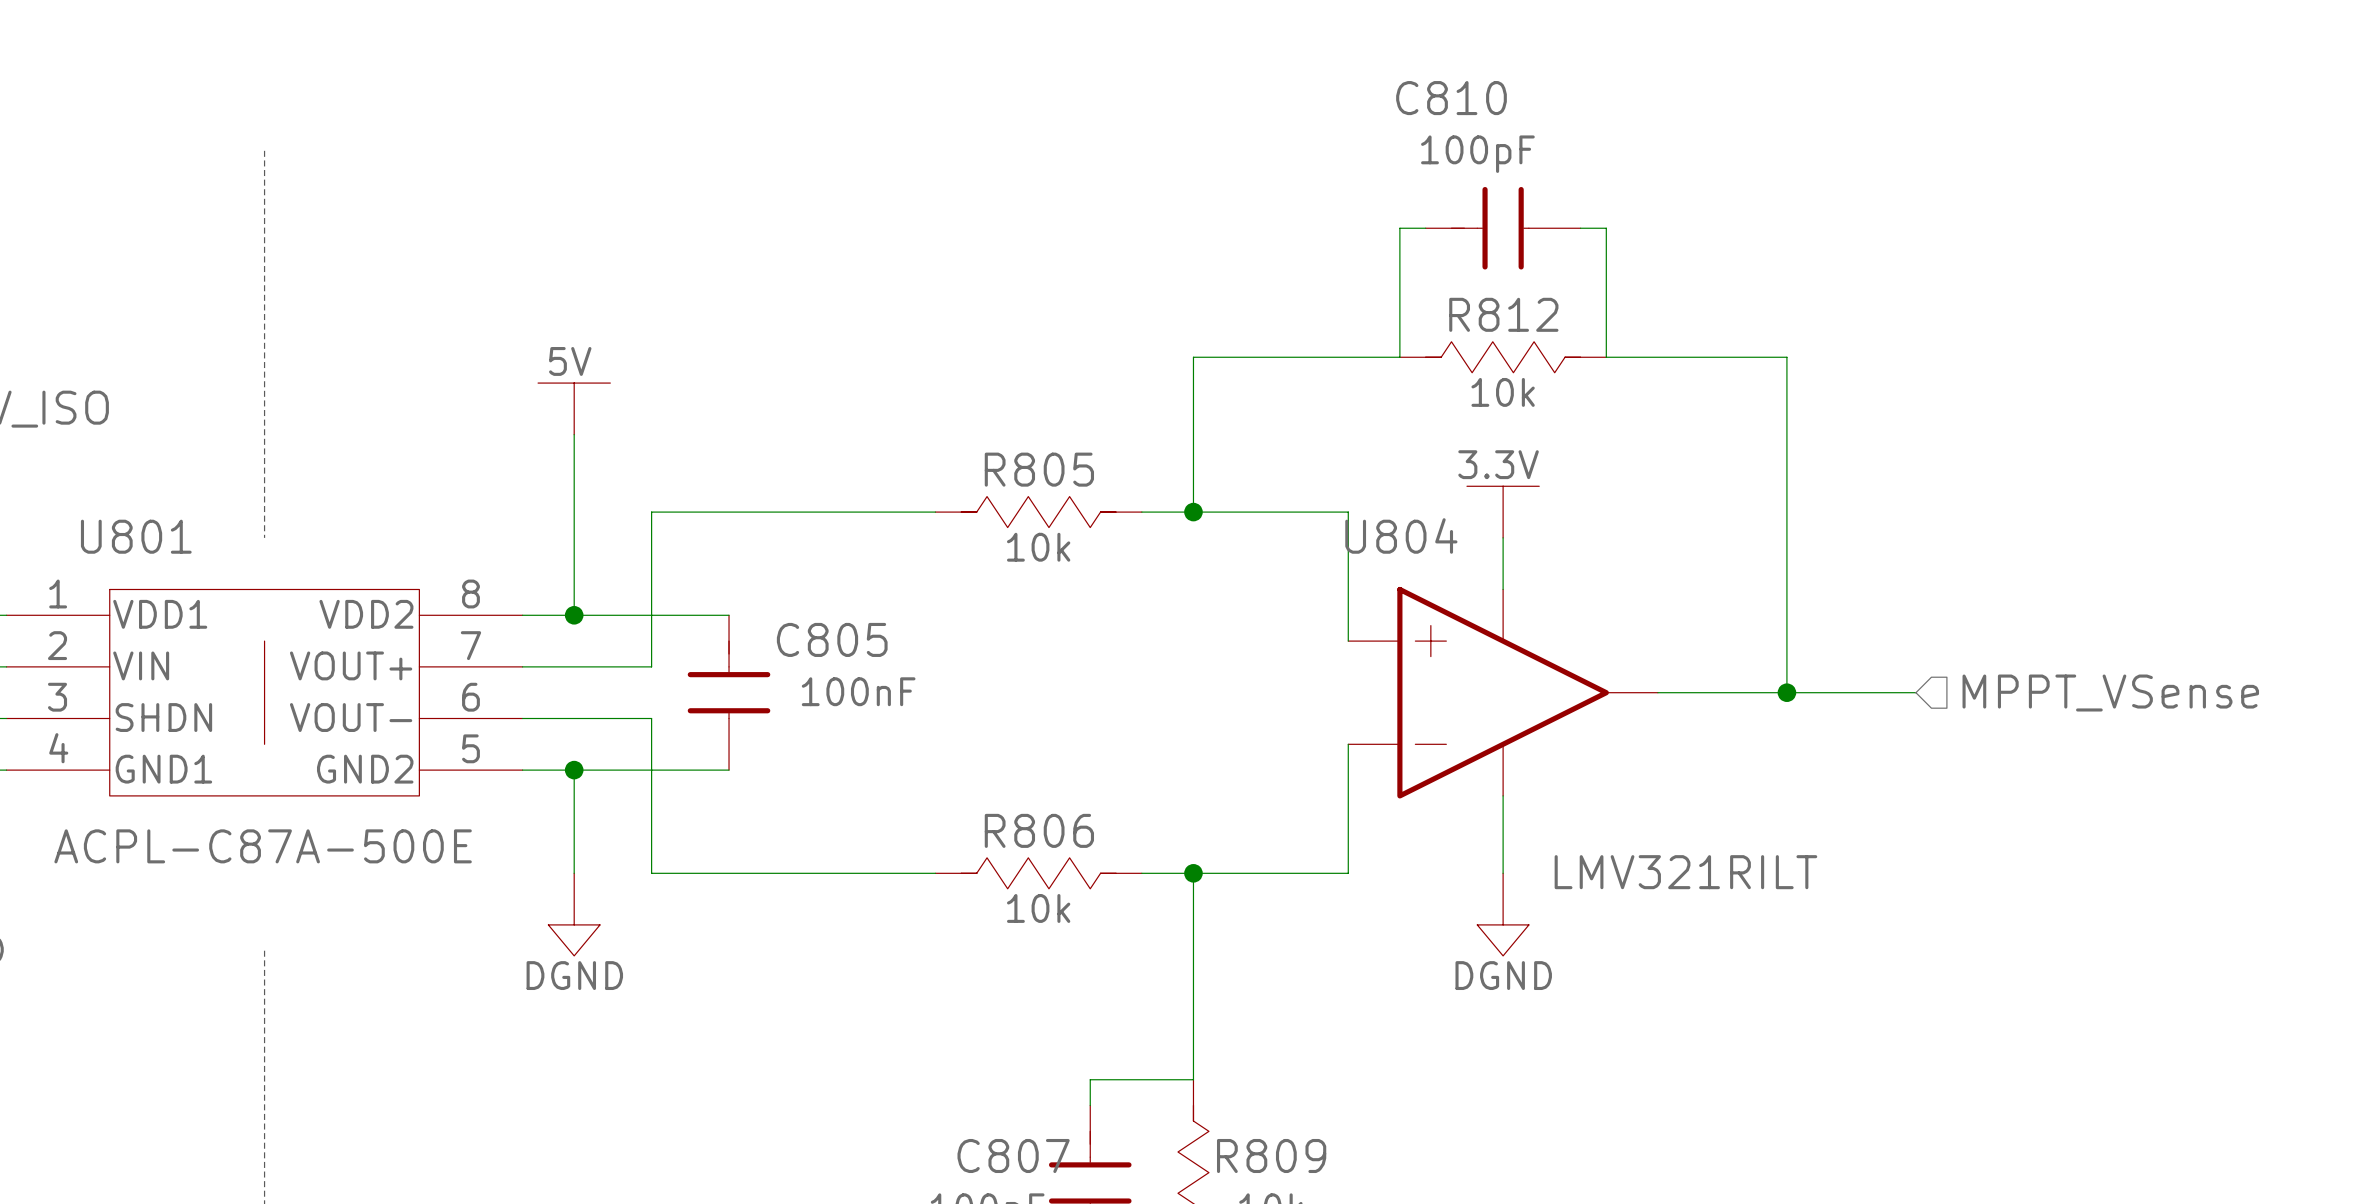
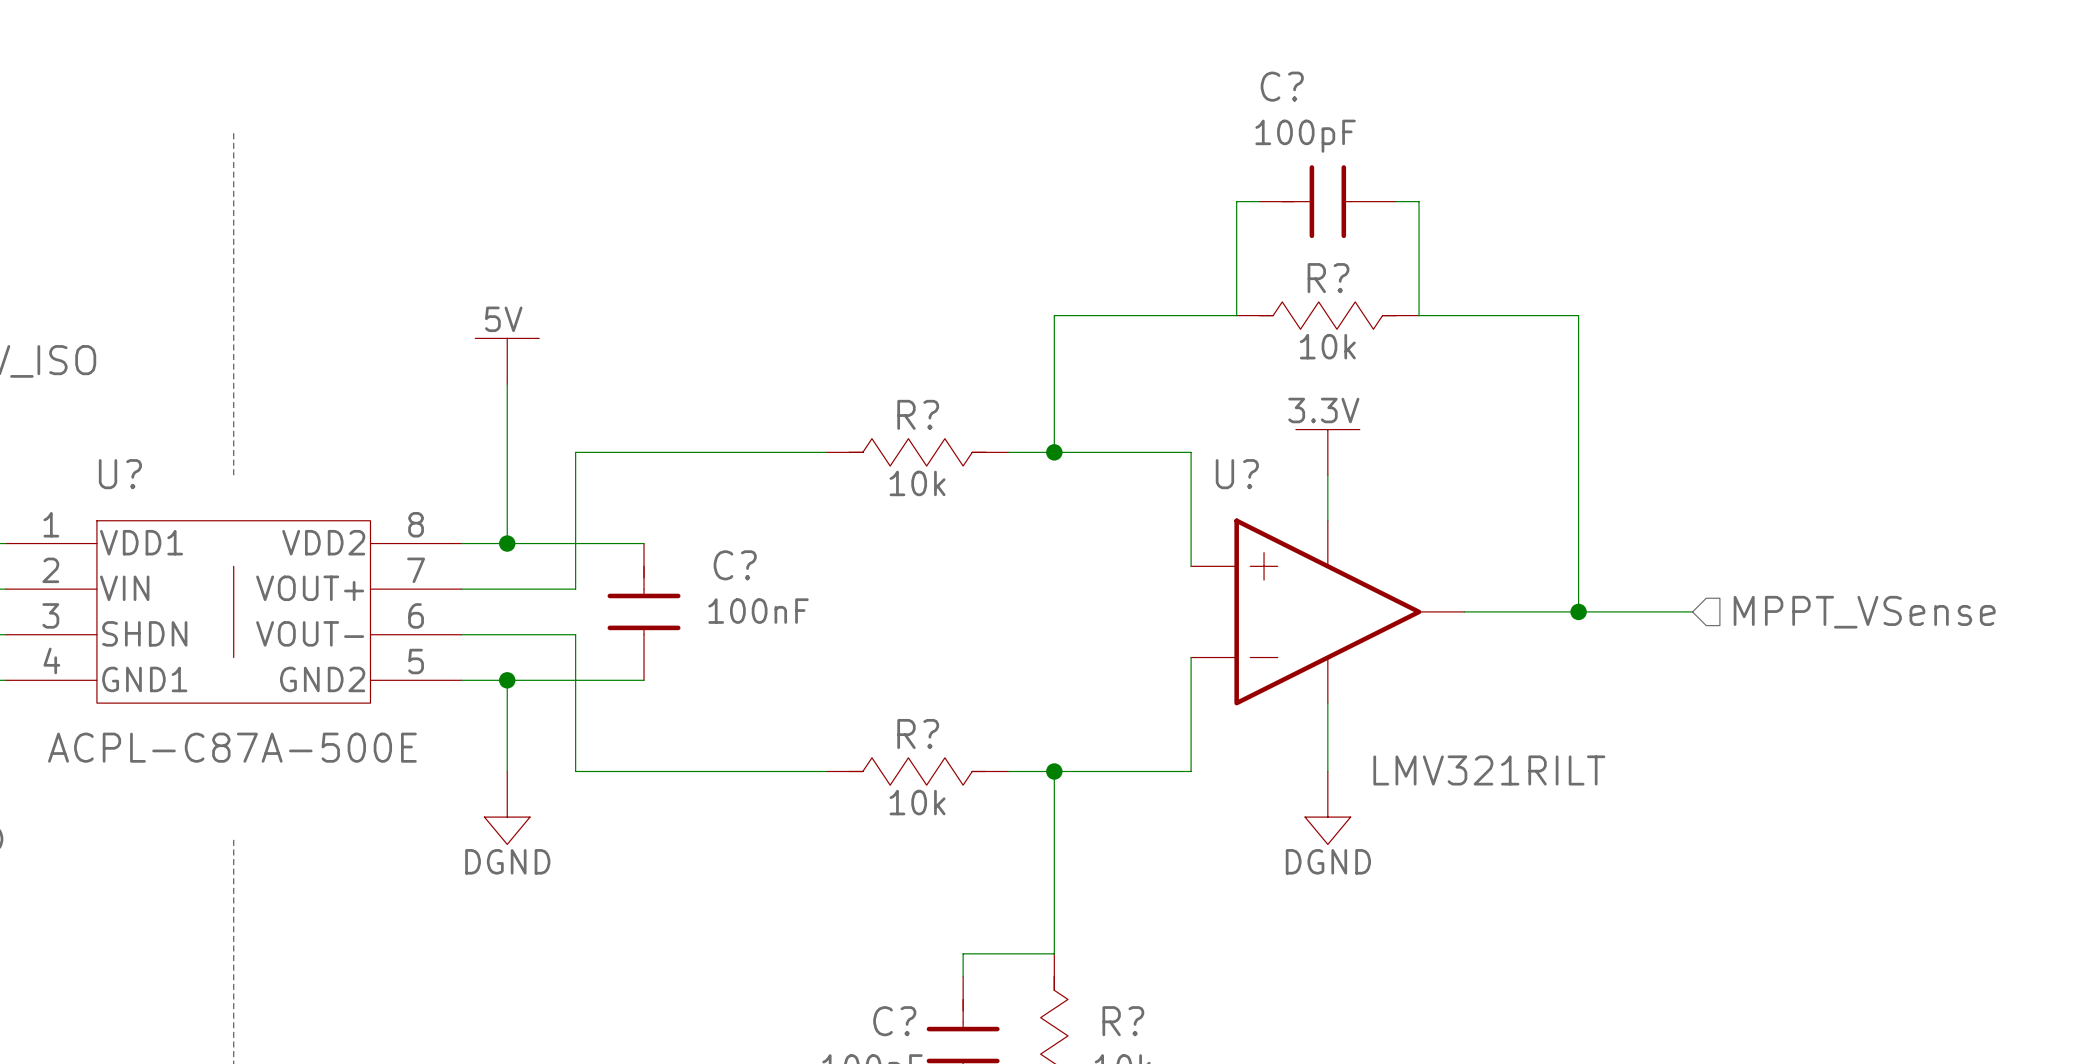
C810 name: C810 (1451, 98) -> C? (1282, 86)
R812 name: R812 (1503, 314) -> R? (1328, 278)
R805 name: R805 (1039, 469) -> R? (918, 414)
U804 name: U804 (1401, 535) -> U? (1237, 474)
U801 name: U801 (136, 536) -> U? (120, 474)
C805 name: C805 (832, 639) -> C? (735, 565)
R806 name: R806 (1039, 830) -> R? (918, 734)
C807 name: C807 (1013, 1155) -> C? (894, 1021)
R809 name: R809 (1271, 1155) -> R? (1123, 1021)

